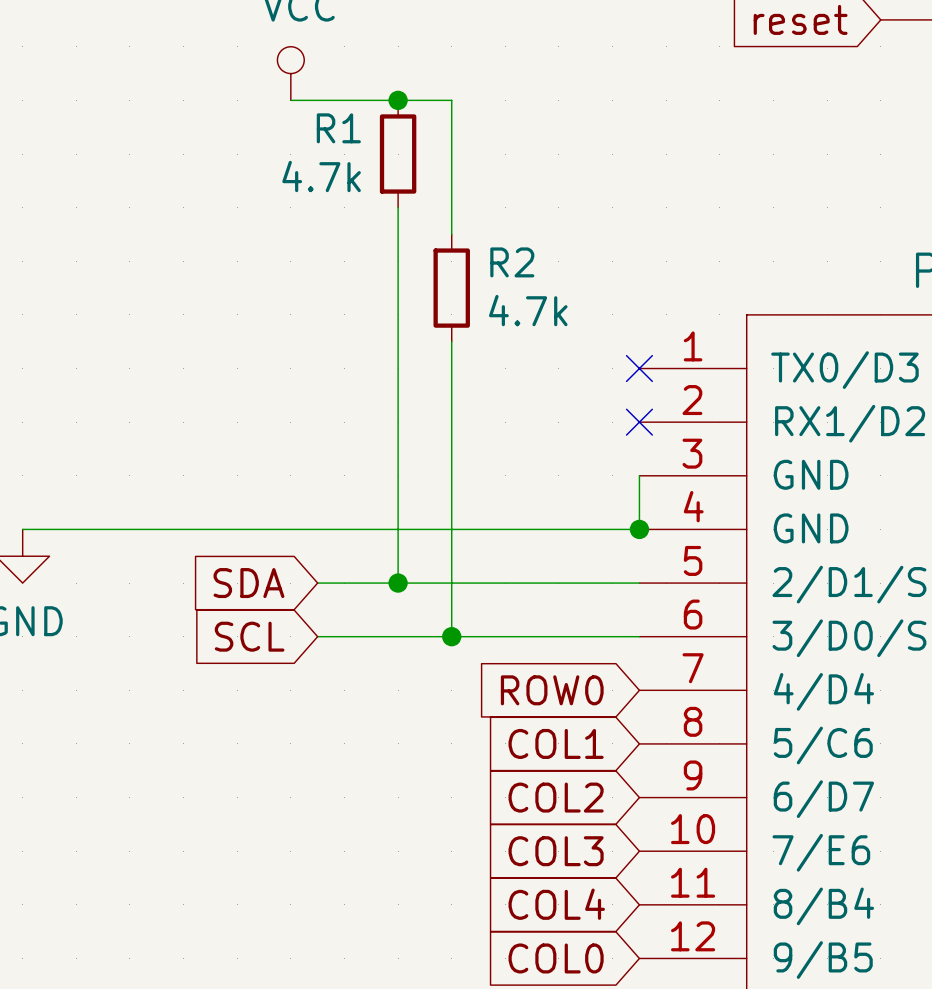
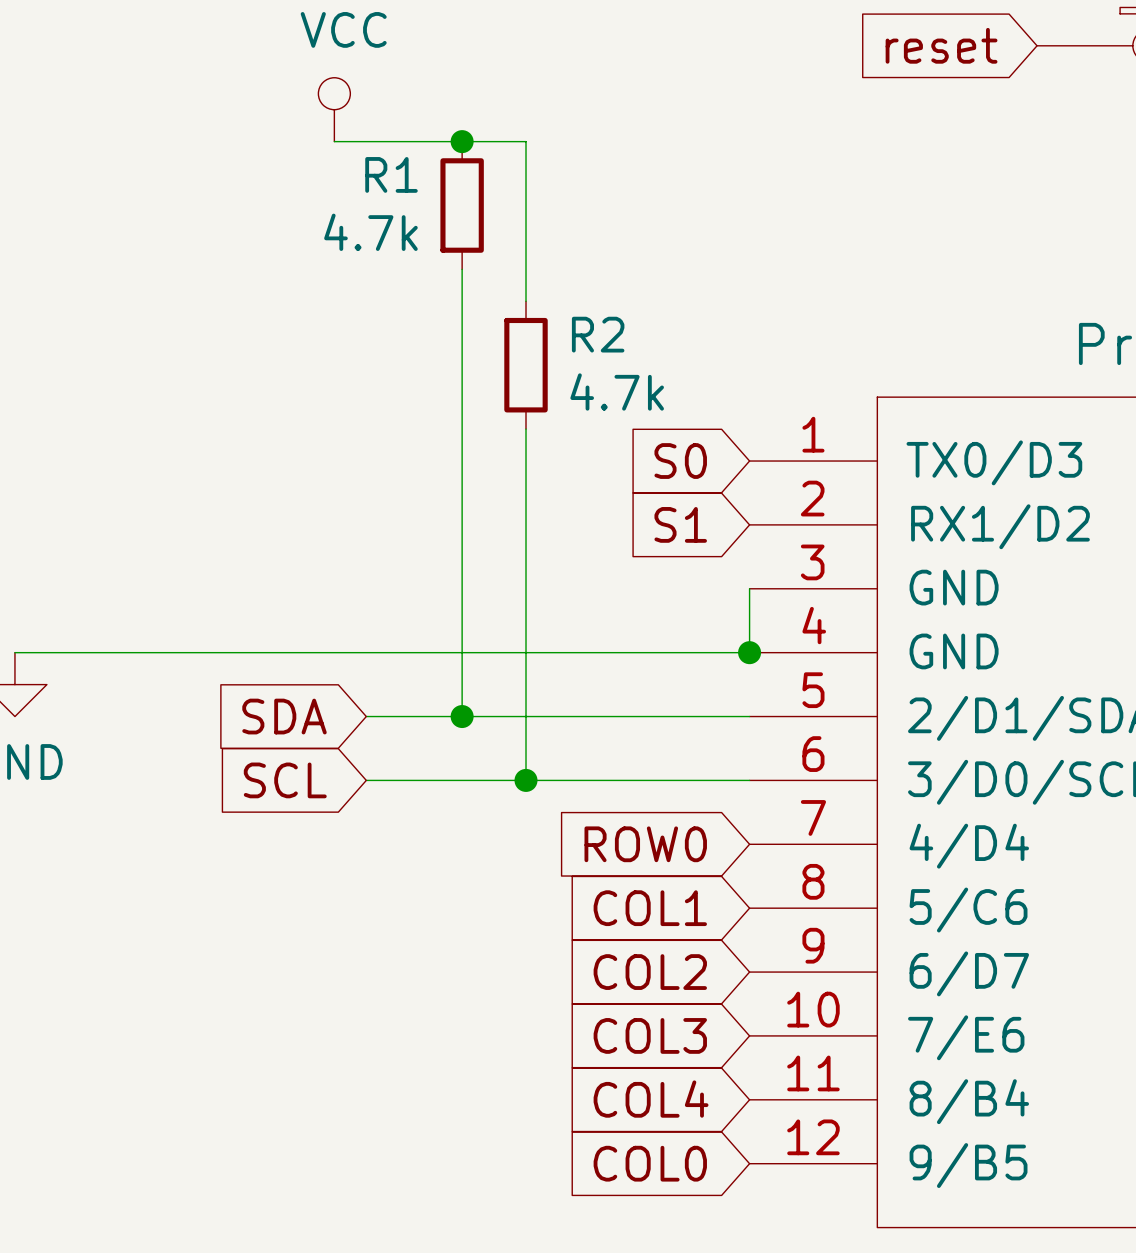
global label: none -> S0 (680, 461)
no-connect mark: (639, 368) -> none
global label: none -> S1 (680, 524)
no-connect mark: (639, 422) -> none

